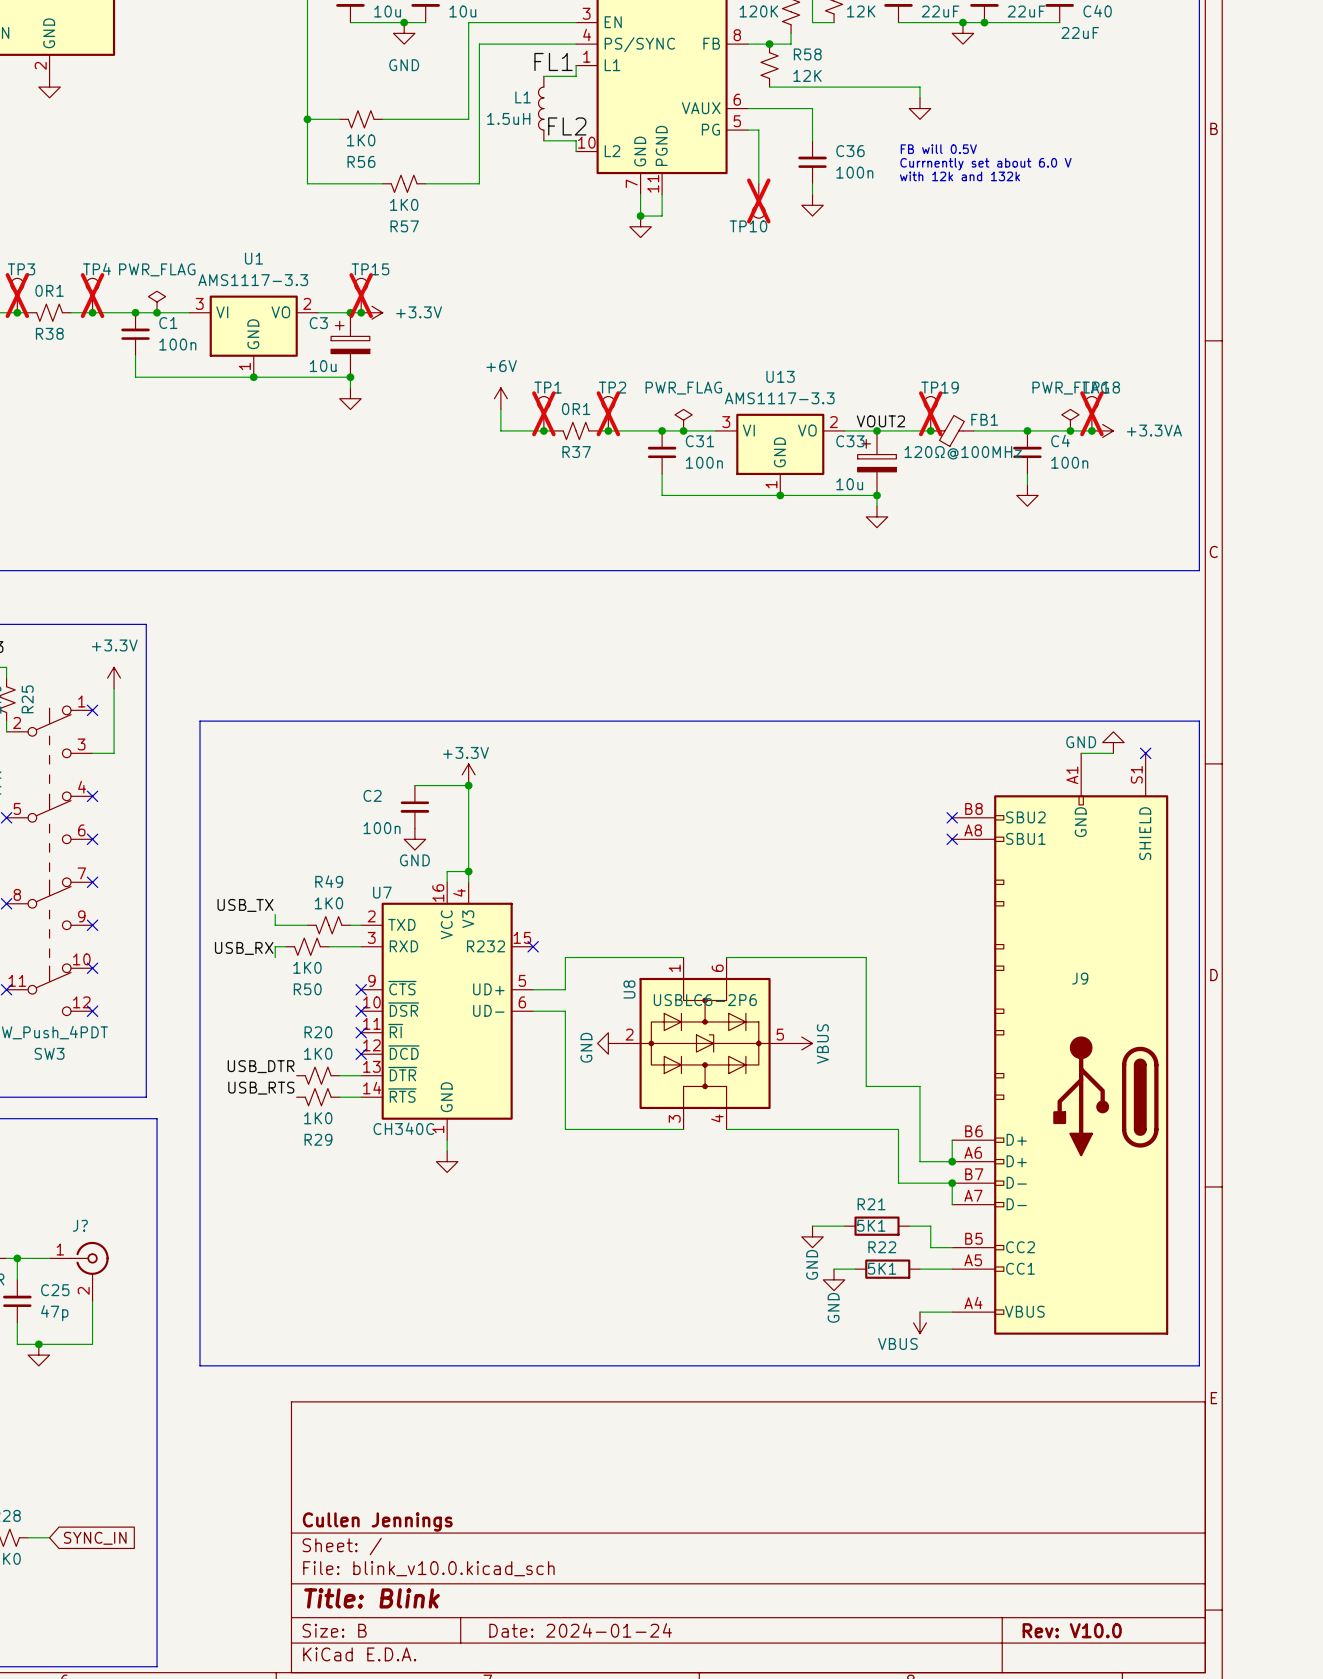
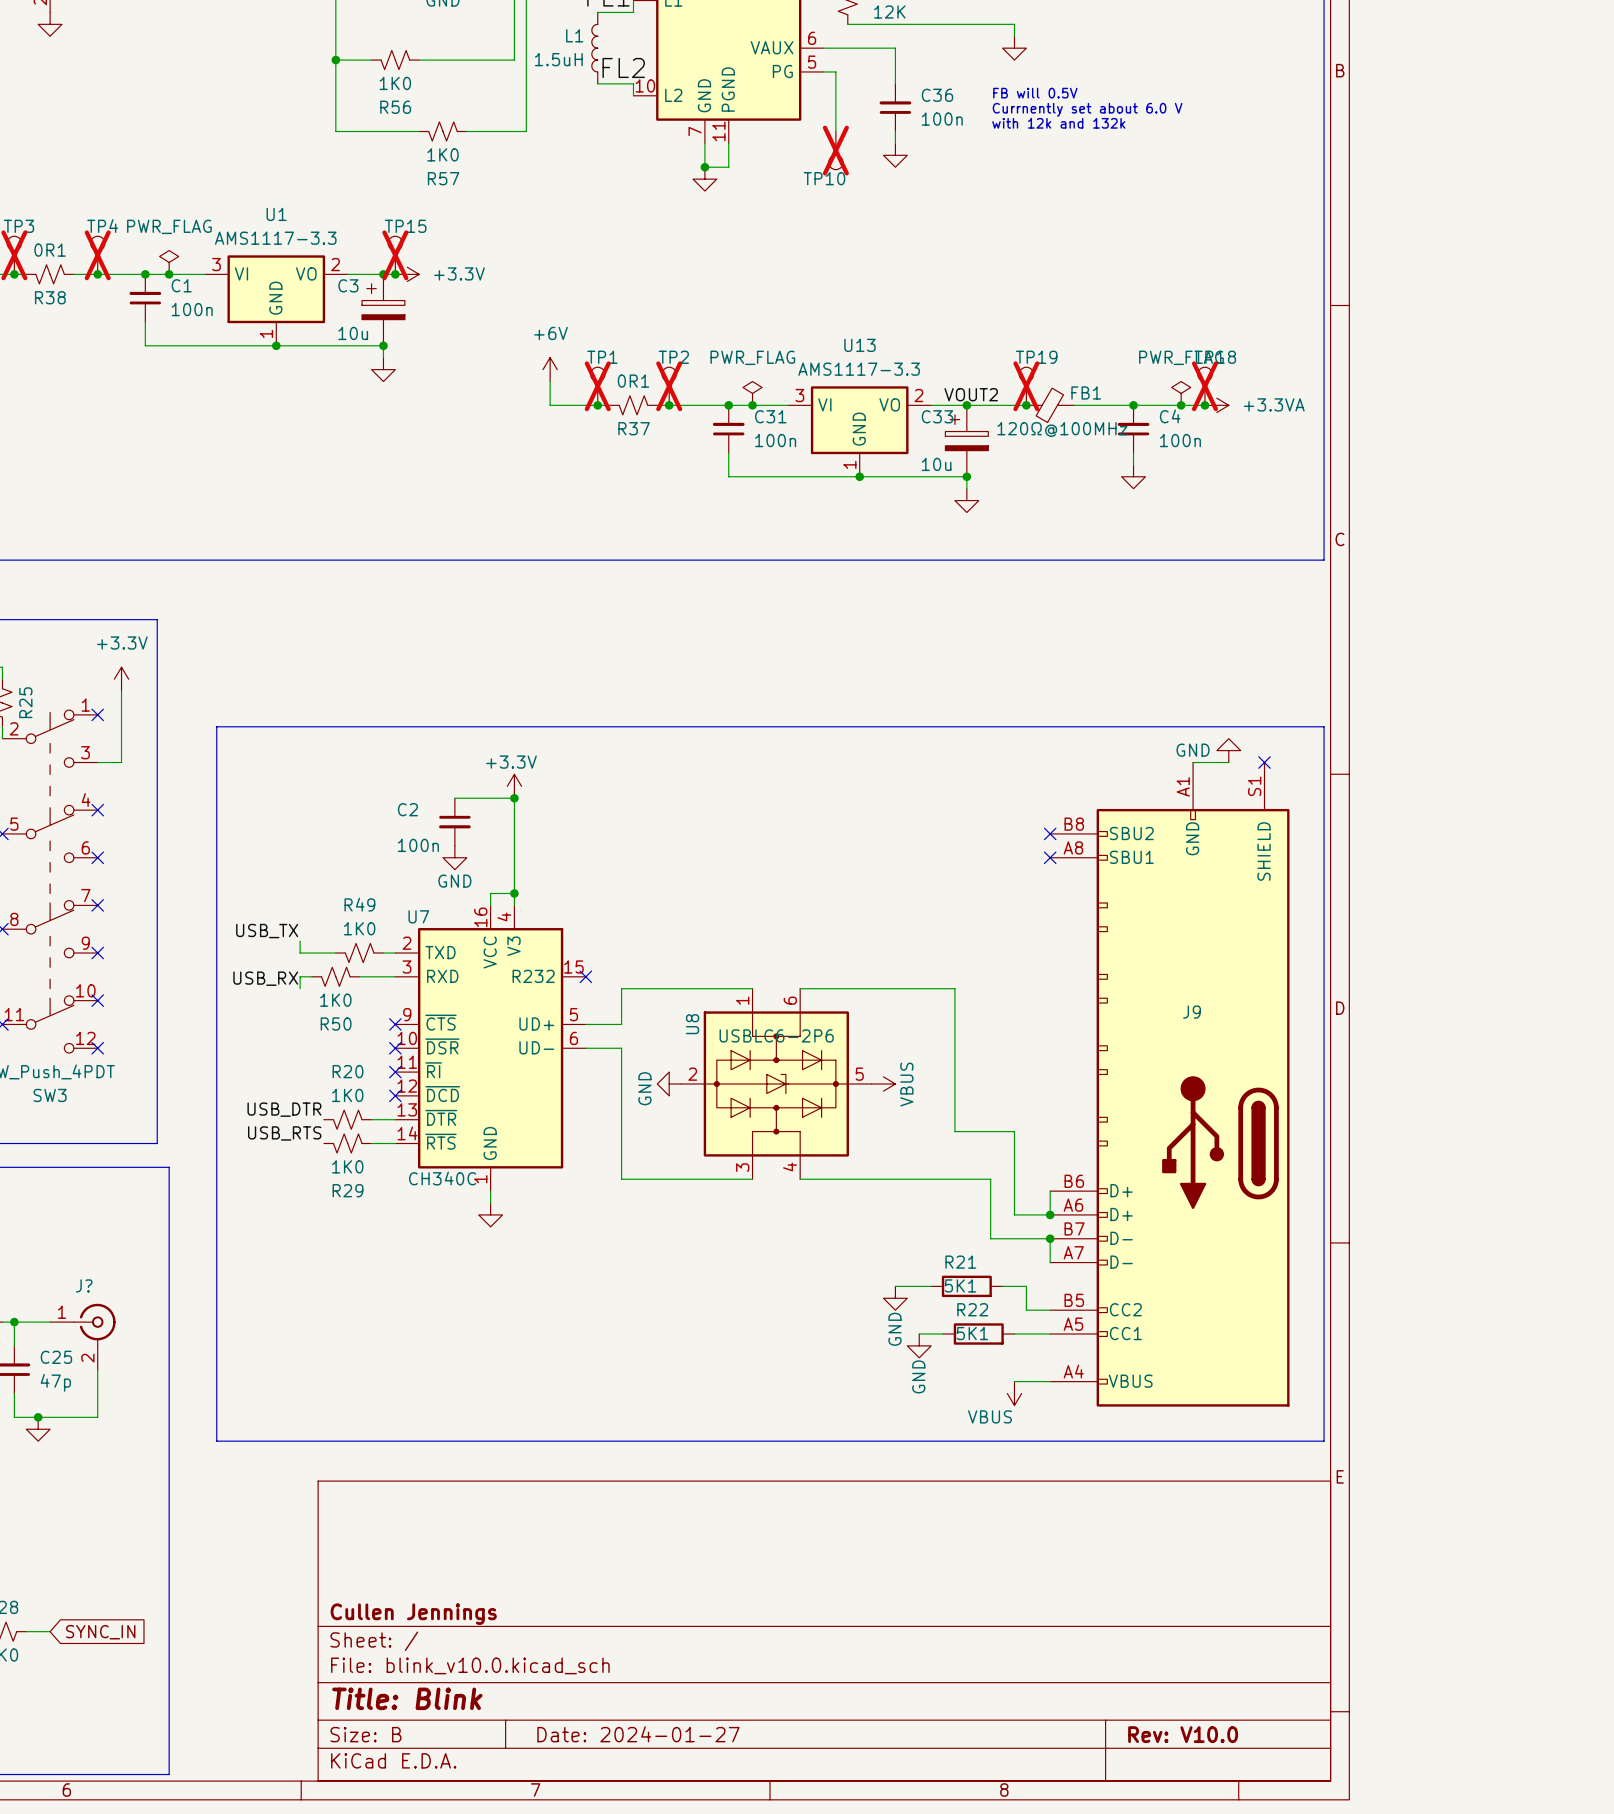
title block: Date: 2024-01-24 (580, 1630) -> Date: 2024-01-27 (638, 1734)

